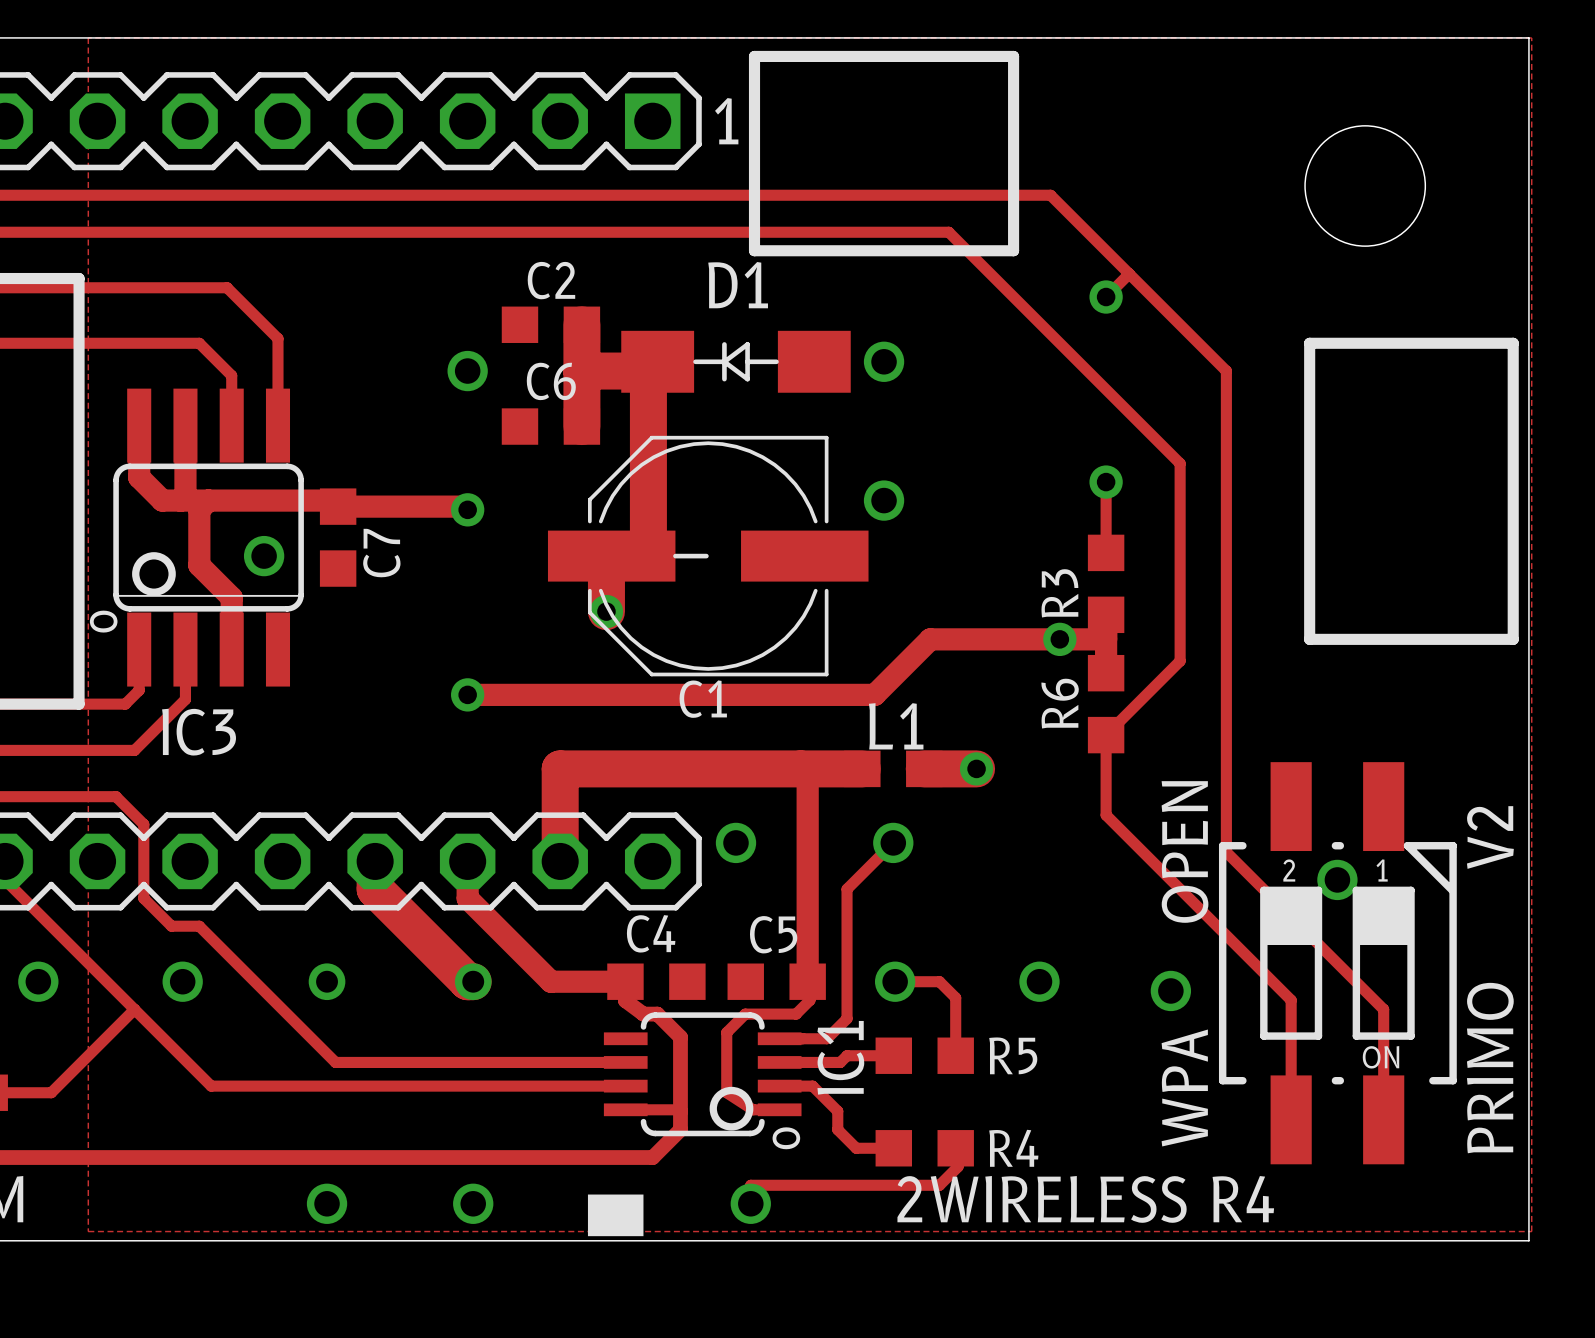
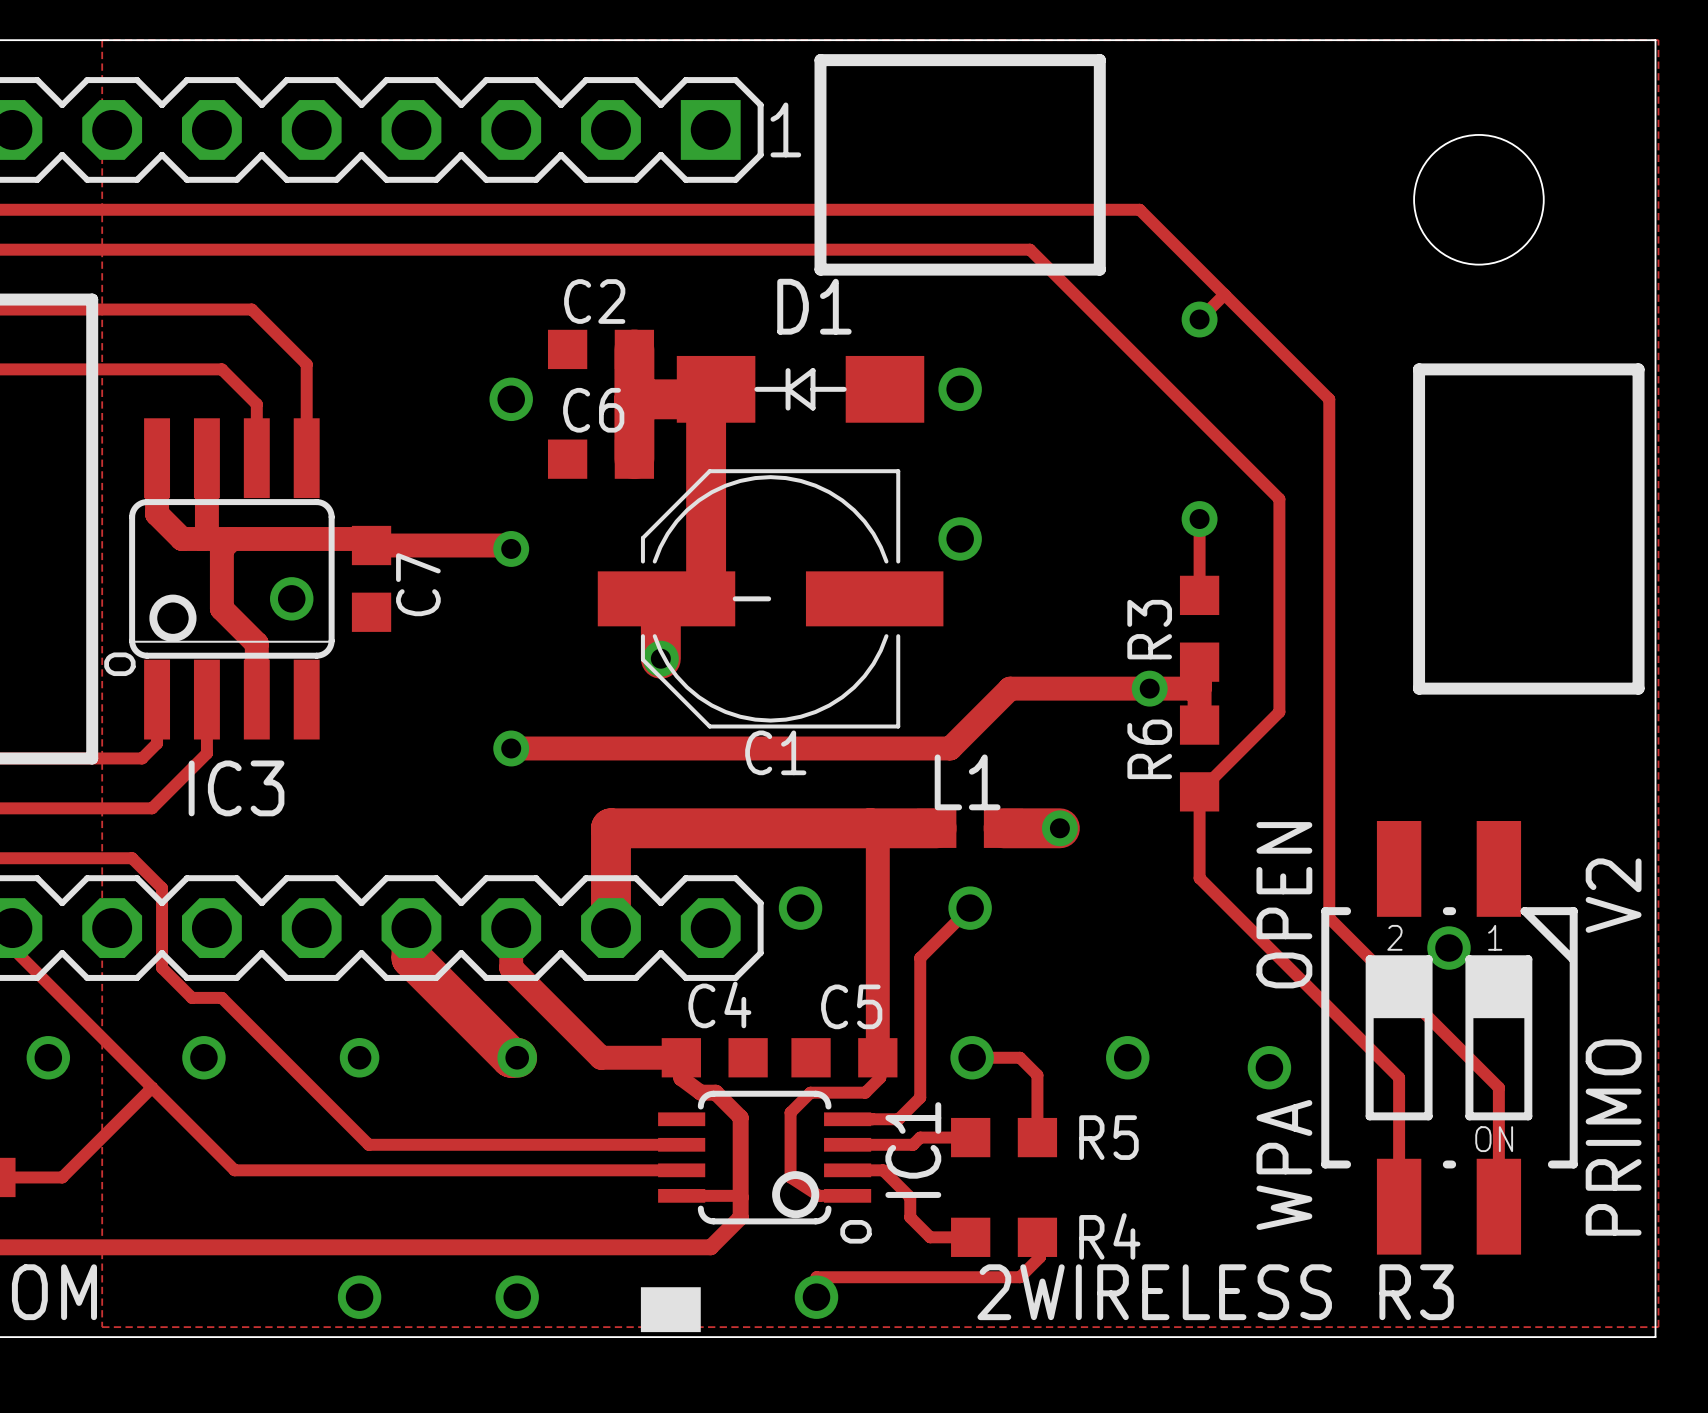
text: 2WIRELESS R4 (1085, 1199) -> 2WIRELESS R3 (1215, 1292)

